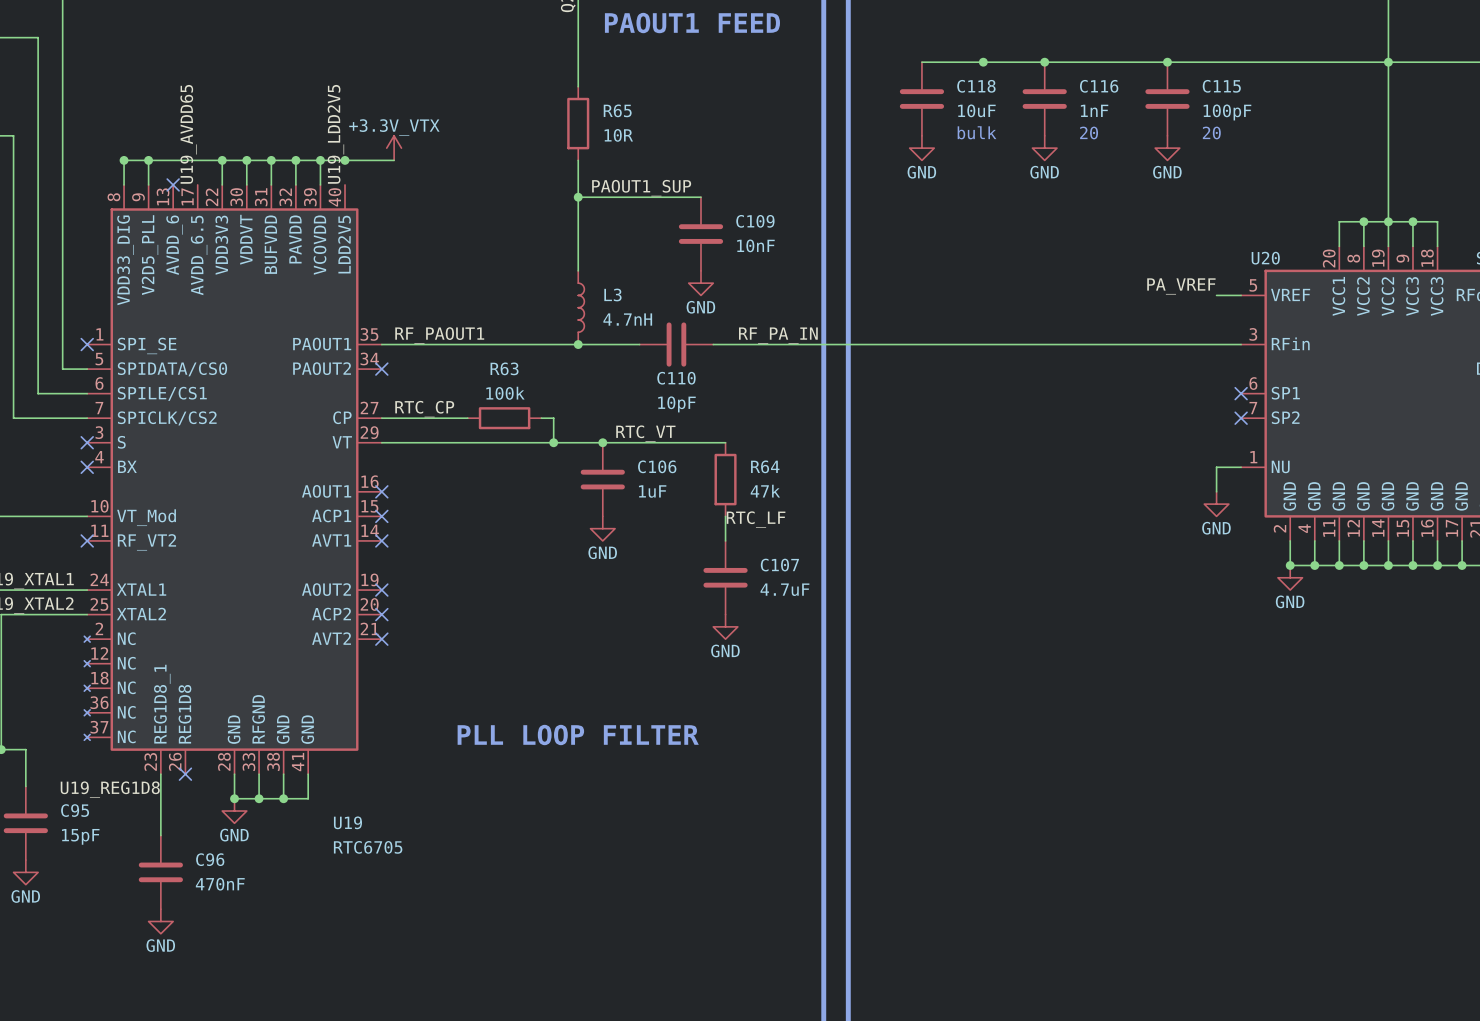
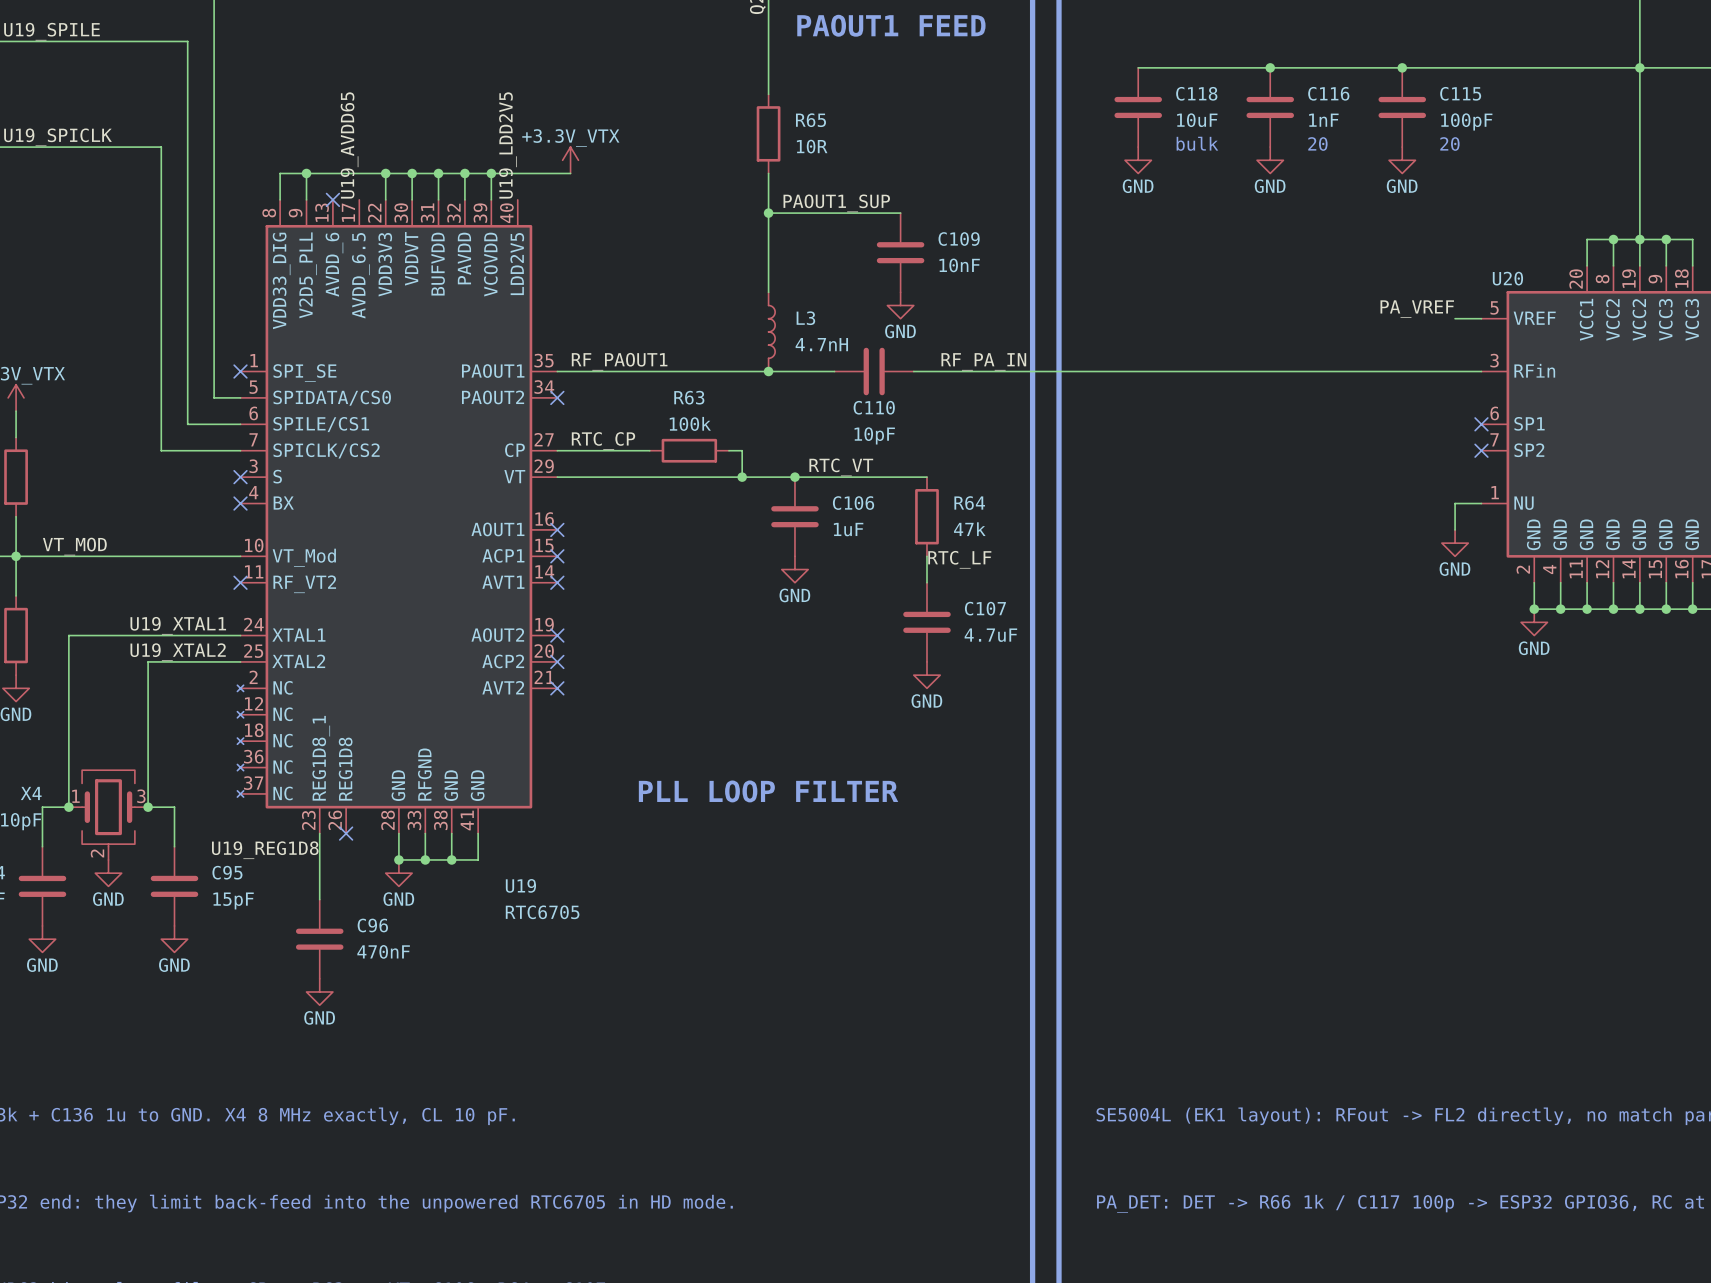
junction: (983, 62) -> none
junction: (124, 160) -> none
junction: (345, 160) -> none

